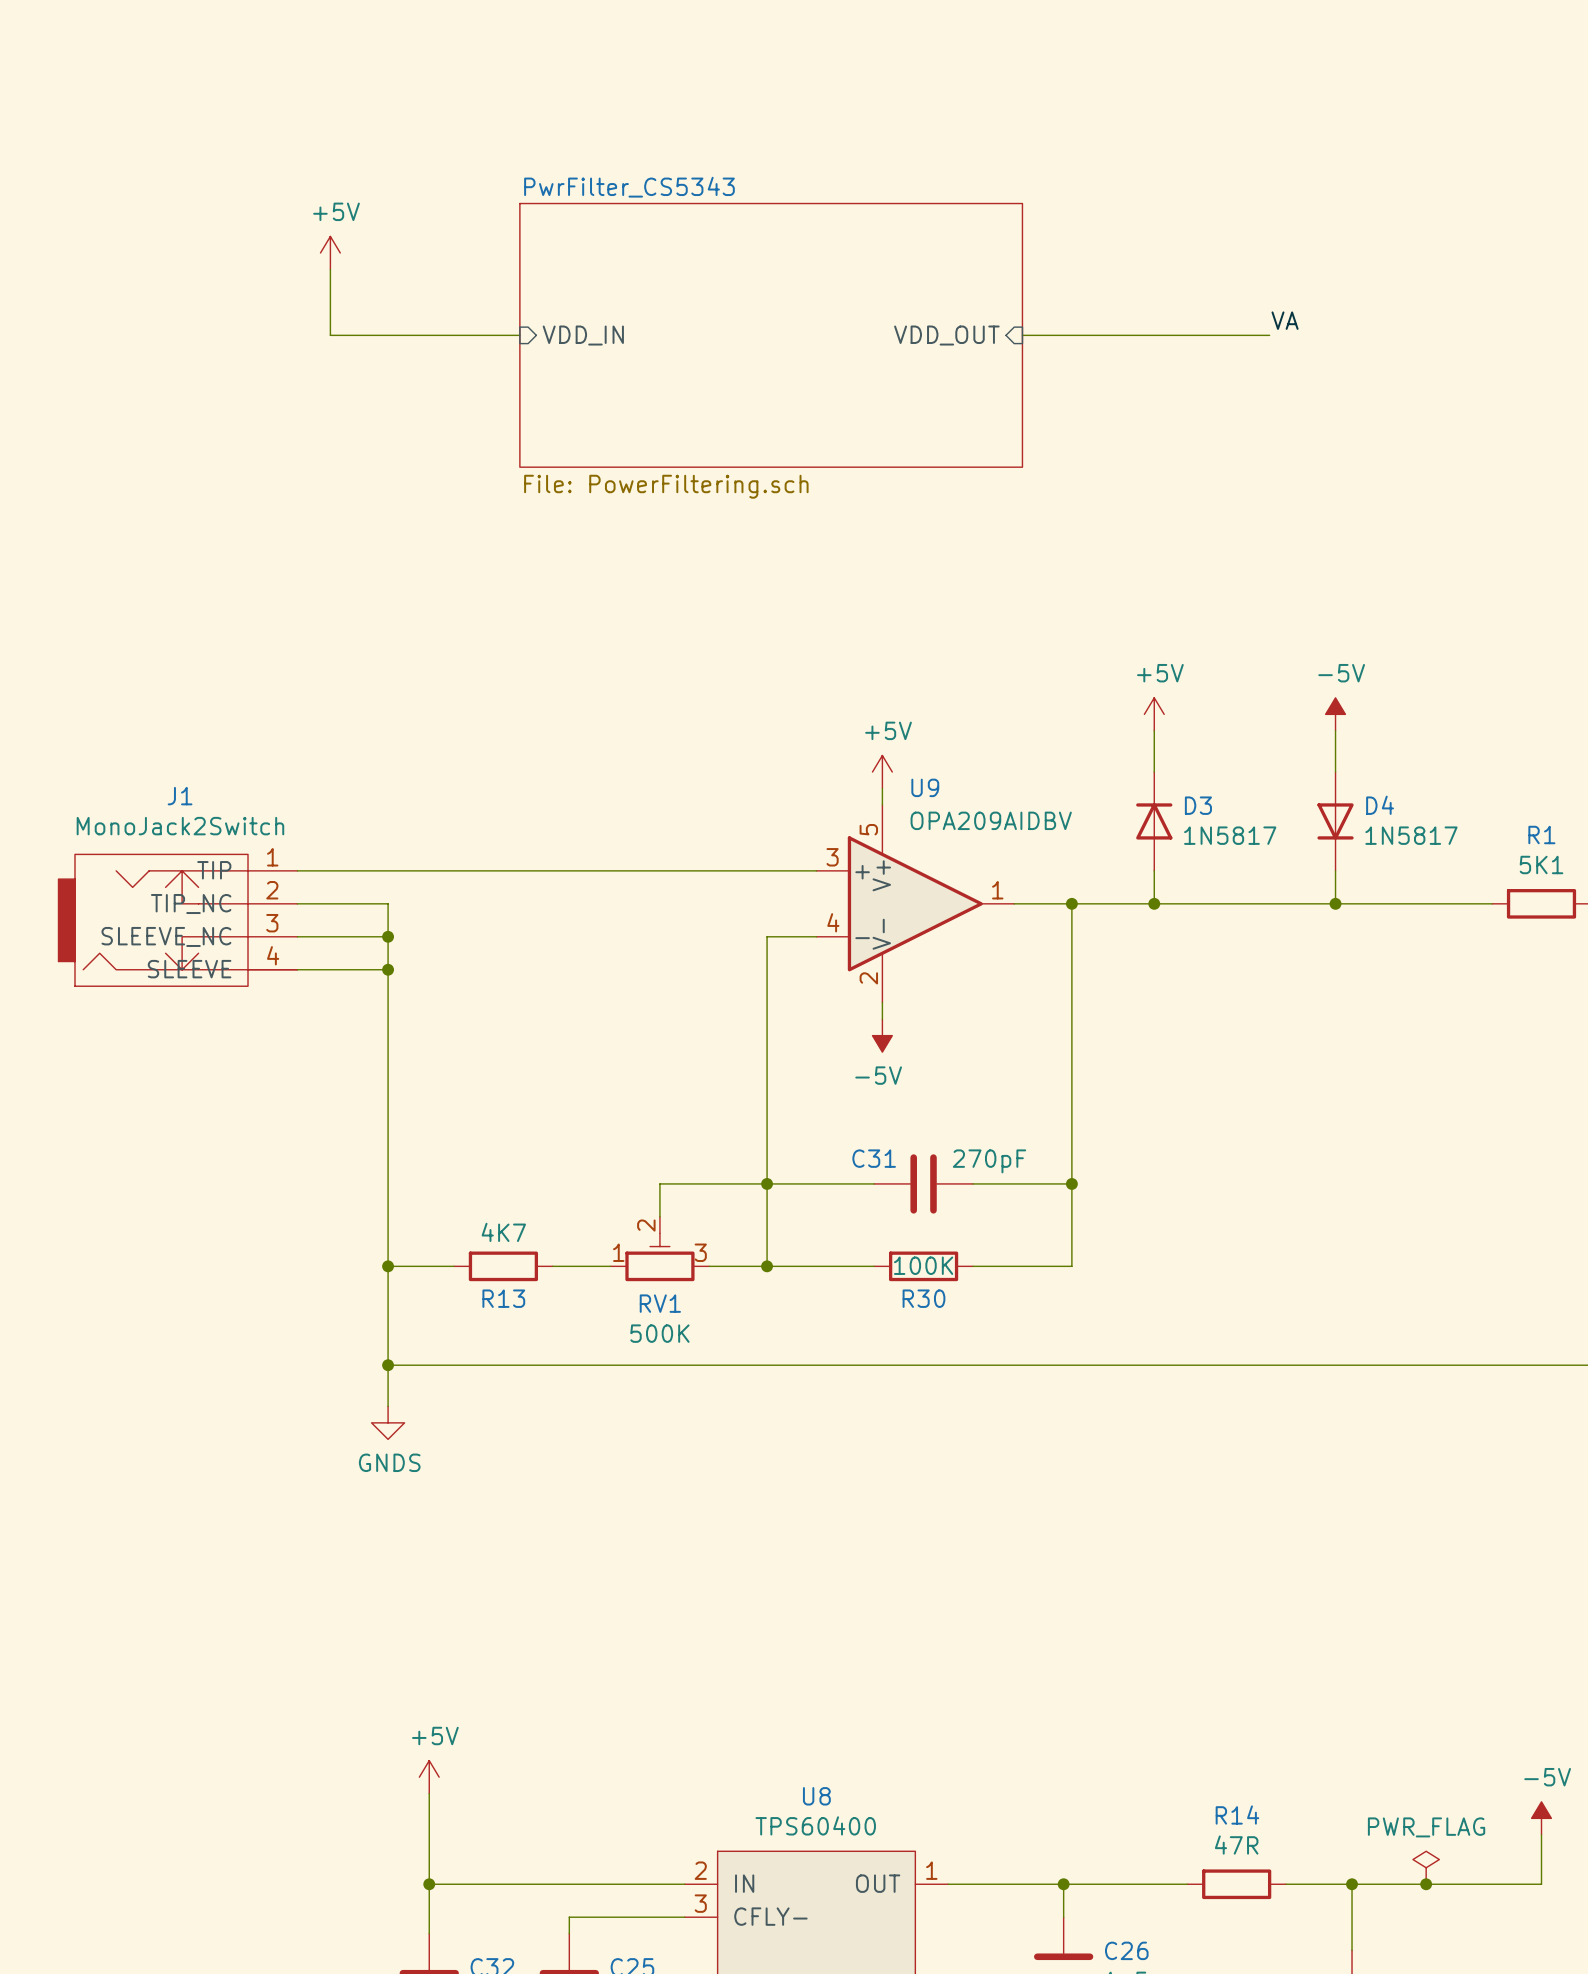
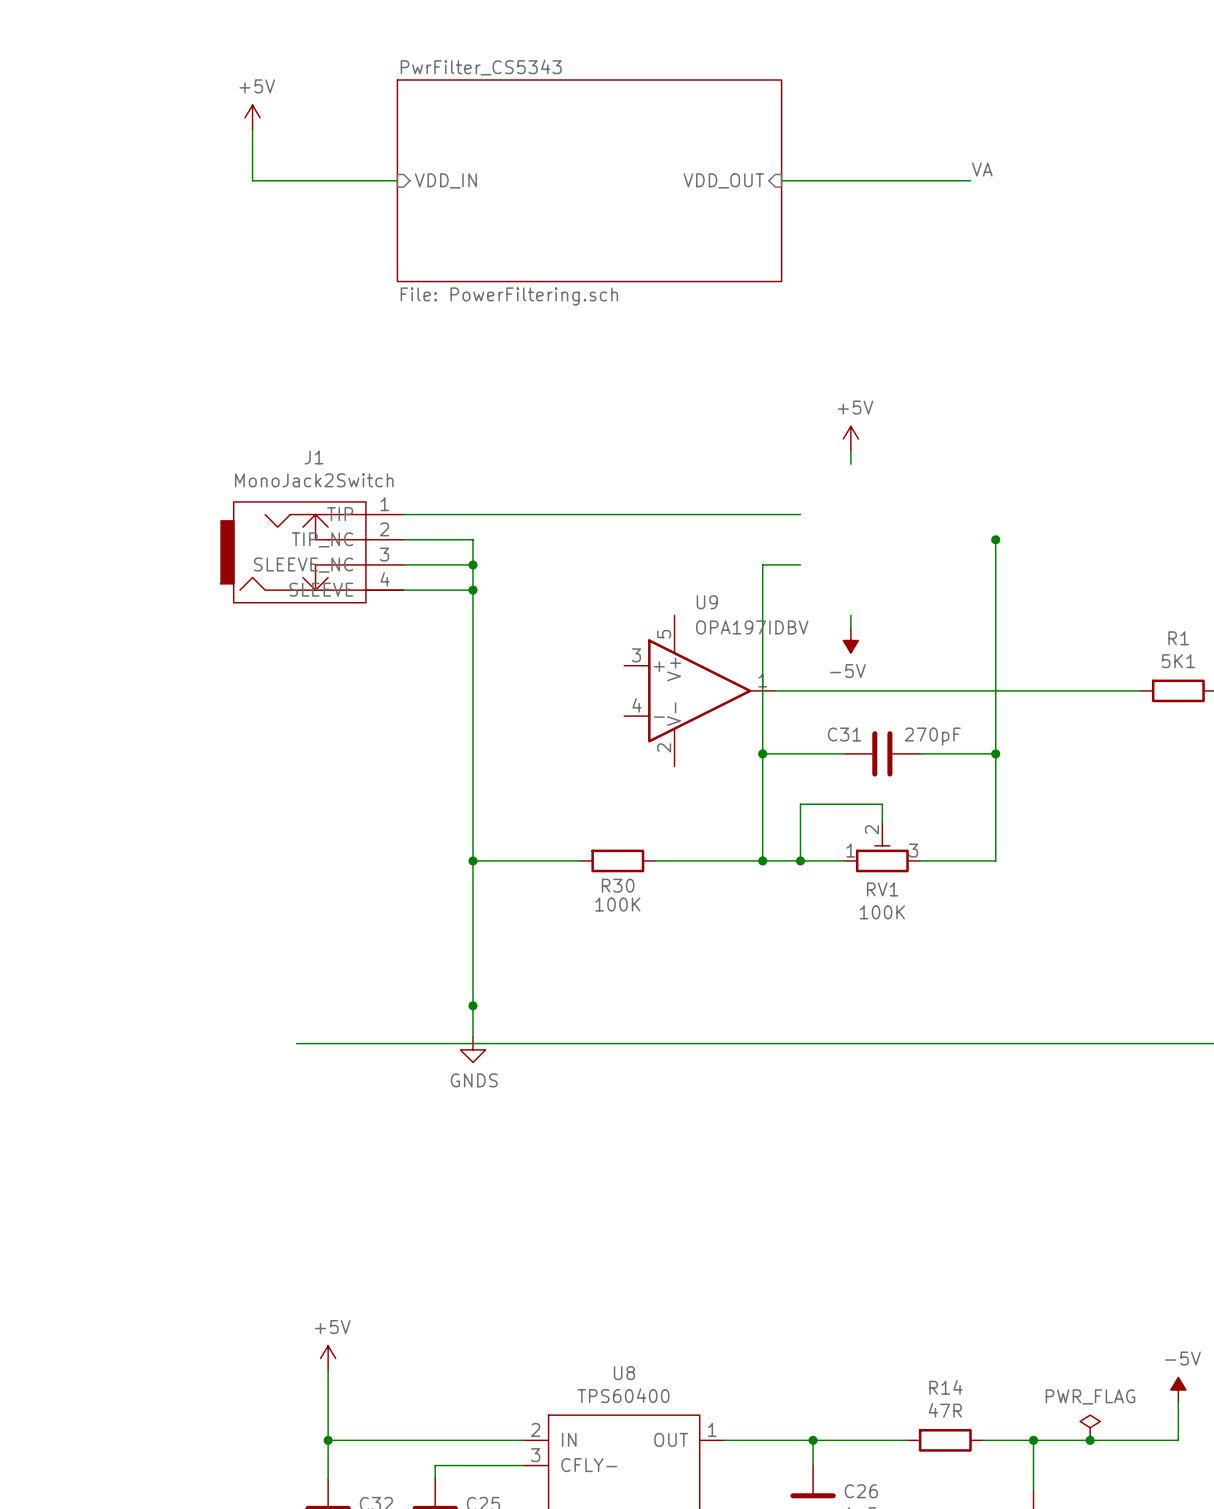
power symbol position: +5V (330, 252) -> +5V (252, 117)
wire: (330, 269) (330, 335) (519, 335) -> (252, 130) (252, 180) (397, 180)
label position: VA (1285, 320) -> VA (982, 169)
sheet pin position: VDD_IN (583, 335) -> VDD_IN (445, 180)
sheet PwrFilter_CS5343 position: (771, 335) -> (589, 180)
sheet pin position: VDD_OUT (946, 335) -> VDD_OUT (723, 180)
wire: (1022, 335) (1269, 335) -> (781, 180) (970, 180)
wire: none -> (403, 539) (472, 539) (472, 1037)
wire: none -> (995, 539) (995, 860) (920, 860)
junction: none -> (995, 539)
power symbol position: +5V (1154, 714) -> +5V (850, 438)
power symbol: -5V (1335, 714) -> none
wire: (1154, 730) (1154, 772) -> none
wire: (1335, 730) (1335, 772) -> none
junction: none -> (472, 564)
wire: none -> (800, 564) (762, 564) (762, 860)
junction: none -> (472, 590)
power symbol: +5V (882, 772) -> none
wire: (882, 788) (882, 804) -> (850, 451) (850, 464)
U9 value: OPA209AIDBV (991, 820) -> OPA197IDBV (752, 627)
D3: 1N5817 (1154, 821) -> none
D4: 1N5817 (1335, 821) -> none
power symbol: none -> -5V (850, 640)
wire: (297, 870) (816, 870) -> (403, 514) (800, 514)
wire: (1154, 870) (1154, 903) -> none
wire: (1335, 870) (1335, 903) -> none
wire: (297, 903) (388, 903) (388, 1406) -> none
wire: (1071, 903) (1071, 1266) (973, 1266) -> none
junction: (1071, 903) -> none
junction: (1154, 903) -> none
junction: (1335, 903) -> none
J1 position: (177, 920) -> (312, 552)
wire: (297, 936) (388, 936) -> (403, 564) (472, 564)
junction: (388, 936) -> none
wire: (816, 936) (767, 936) (767, 1266) -> none
wire: (297, 969) (388, 969) -> (403, 590) (472, 590)
junction: (388, 969) -> none
wire: none -> (762, 753) (844, 753)
junction: none -> (762, 753)
junction: none -> (995, 753)
wire: (882, 1002) (882, 1019) -> (850, 615) (850, 627)
power symbol: -5V (882, 1035) -> none
wire: none -> (882, 823) (882, 804) (800, 804) (800, 860)
wire: none -> (472, 860) (580, 860)
junction: none -> (472, 860)
wire: none -> (655, 860) (844, 860)
junction: none -> (762, 860)
junction: none -> (800, 860)
junction: (767, 1183) -> none
wire: (874, 1183) (659, 1183) (659, 1216) -> none
C31 position: (923, 1183) -> (882, 753)
wire: (973, 1183) (1071, 1183) -> (920, 753) (995, 753)
junction: (1071, 1183) -> none
RV1 position: (659, 1249) -> (882, 847)
R30 value position: 100K (923, 1265) -> 100K (617, 904)
wire: (388, 1266) (453, 1266) -> none
junction: (388, 1266) -> none
R13: 4K7 (503, 1266) -> none
wire: (552, 1266) (610, 1266) -> none
wire: (709, 1266) (874, 1266) -> none
junction: (767, 1266) -> none
R30 position: (923, 1266) -> (617, 860)
junction: none -> (472, 1005)
RV1 value: 500K (659, 1333) -> 100K (882, 912)
junction: (388, 1365) -> none
power symbol position: GNDS (388, 1422) -> GNDS (472, 1049)

